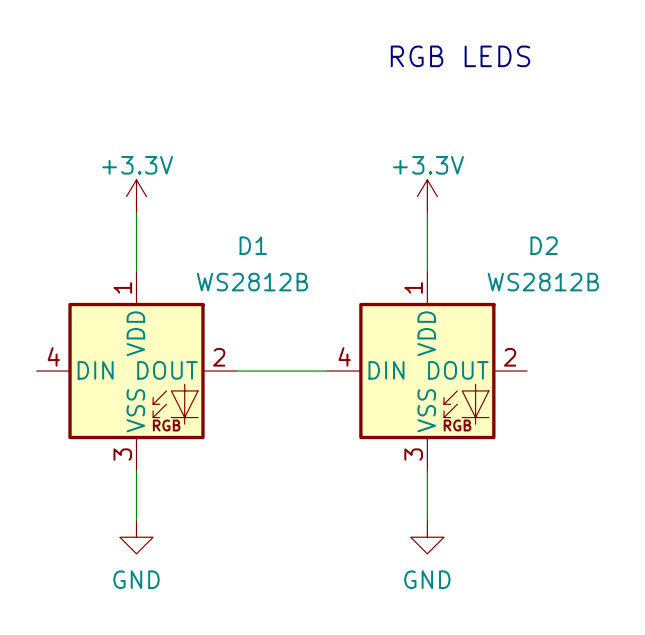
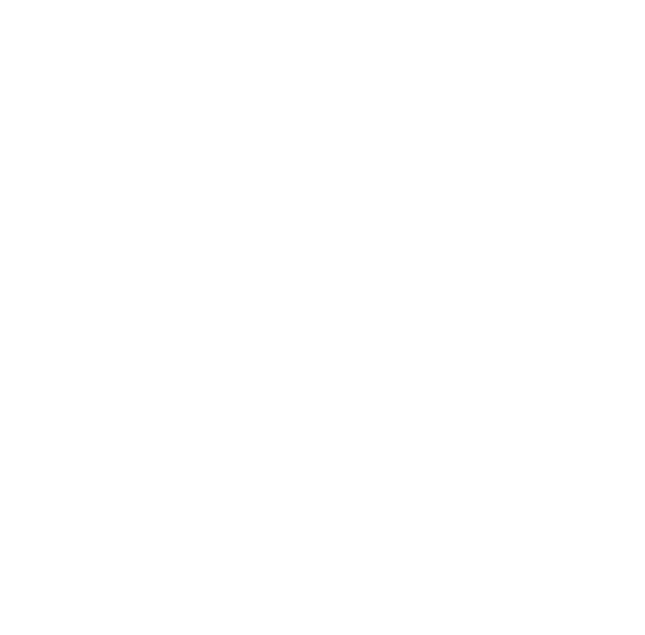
text: RGB LEDS (460, 56) -> none
power symbol: +3.3V (136, 196) -> none
power symbol: +3.3V (427, 196) -> none
wire: (136, 213) (136, 271) -> none
wire: (427, 213) (427, 271) -> none
D1: WS2812B (136, 371) -> none
wire: (236, 371) (327, 371) -> none
D2: WS2812B (427, 371) -> none
wire: (136, 470) (136, 520) -> none
wire: (427, 470) (427, 520) -> none
power symbol: GND (136, 537) -> none
power symbol: GND (427, 537) -> none

